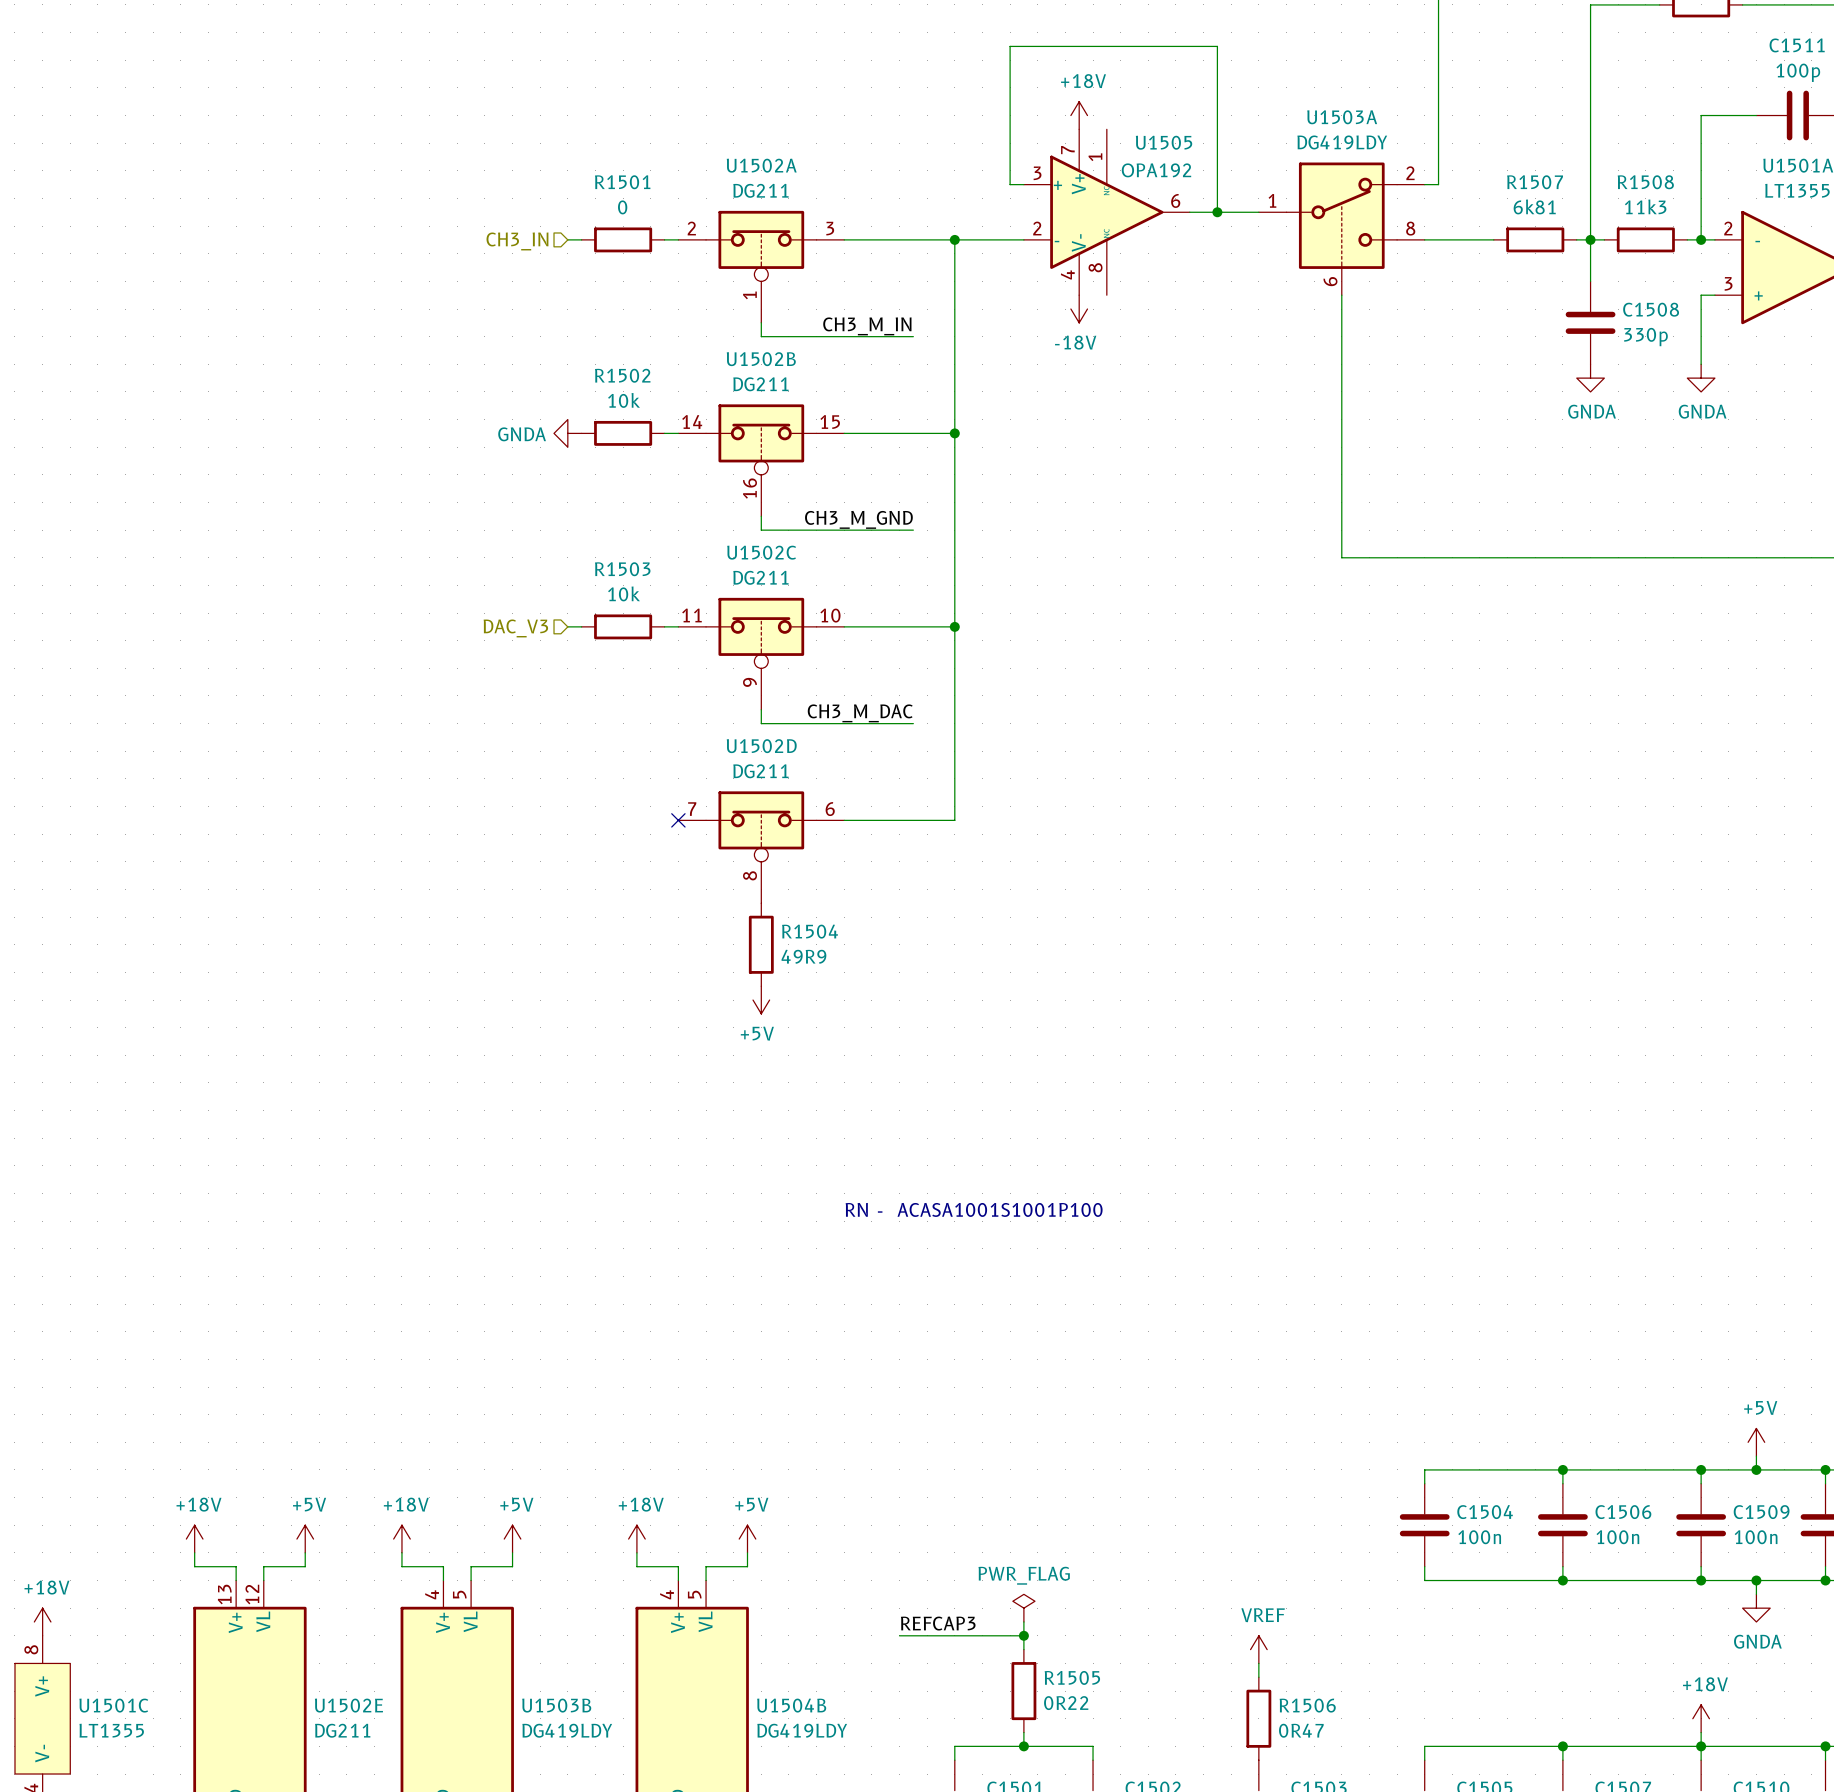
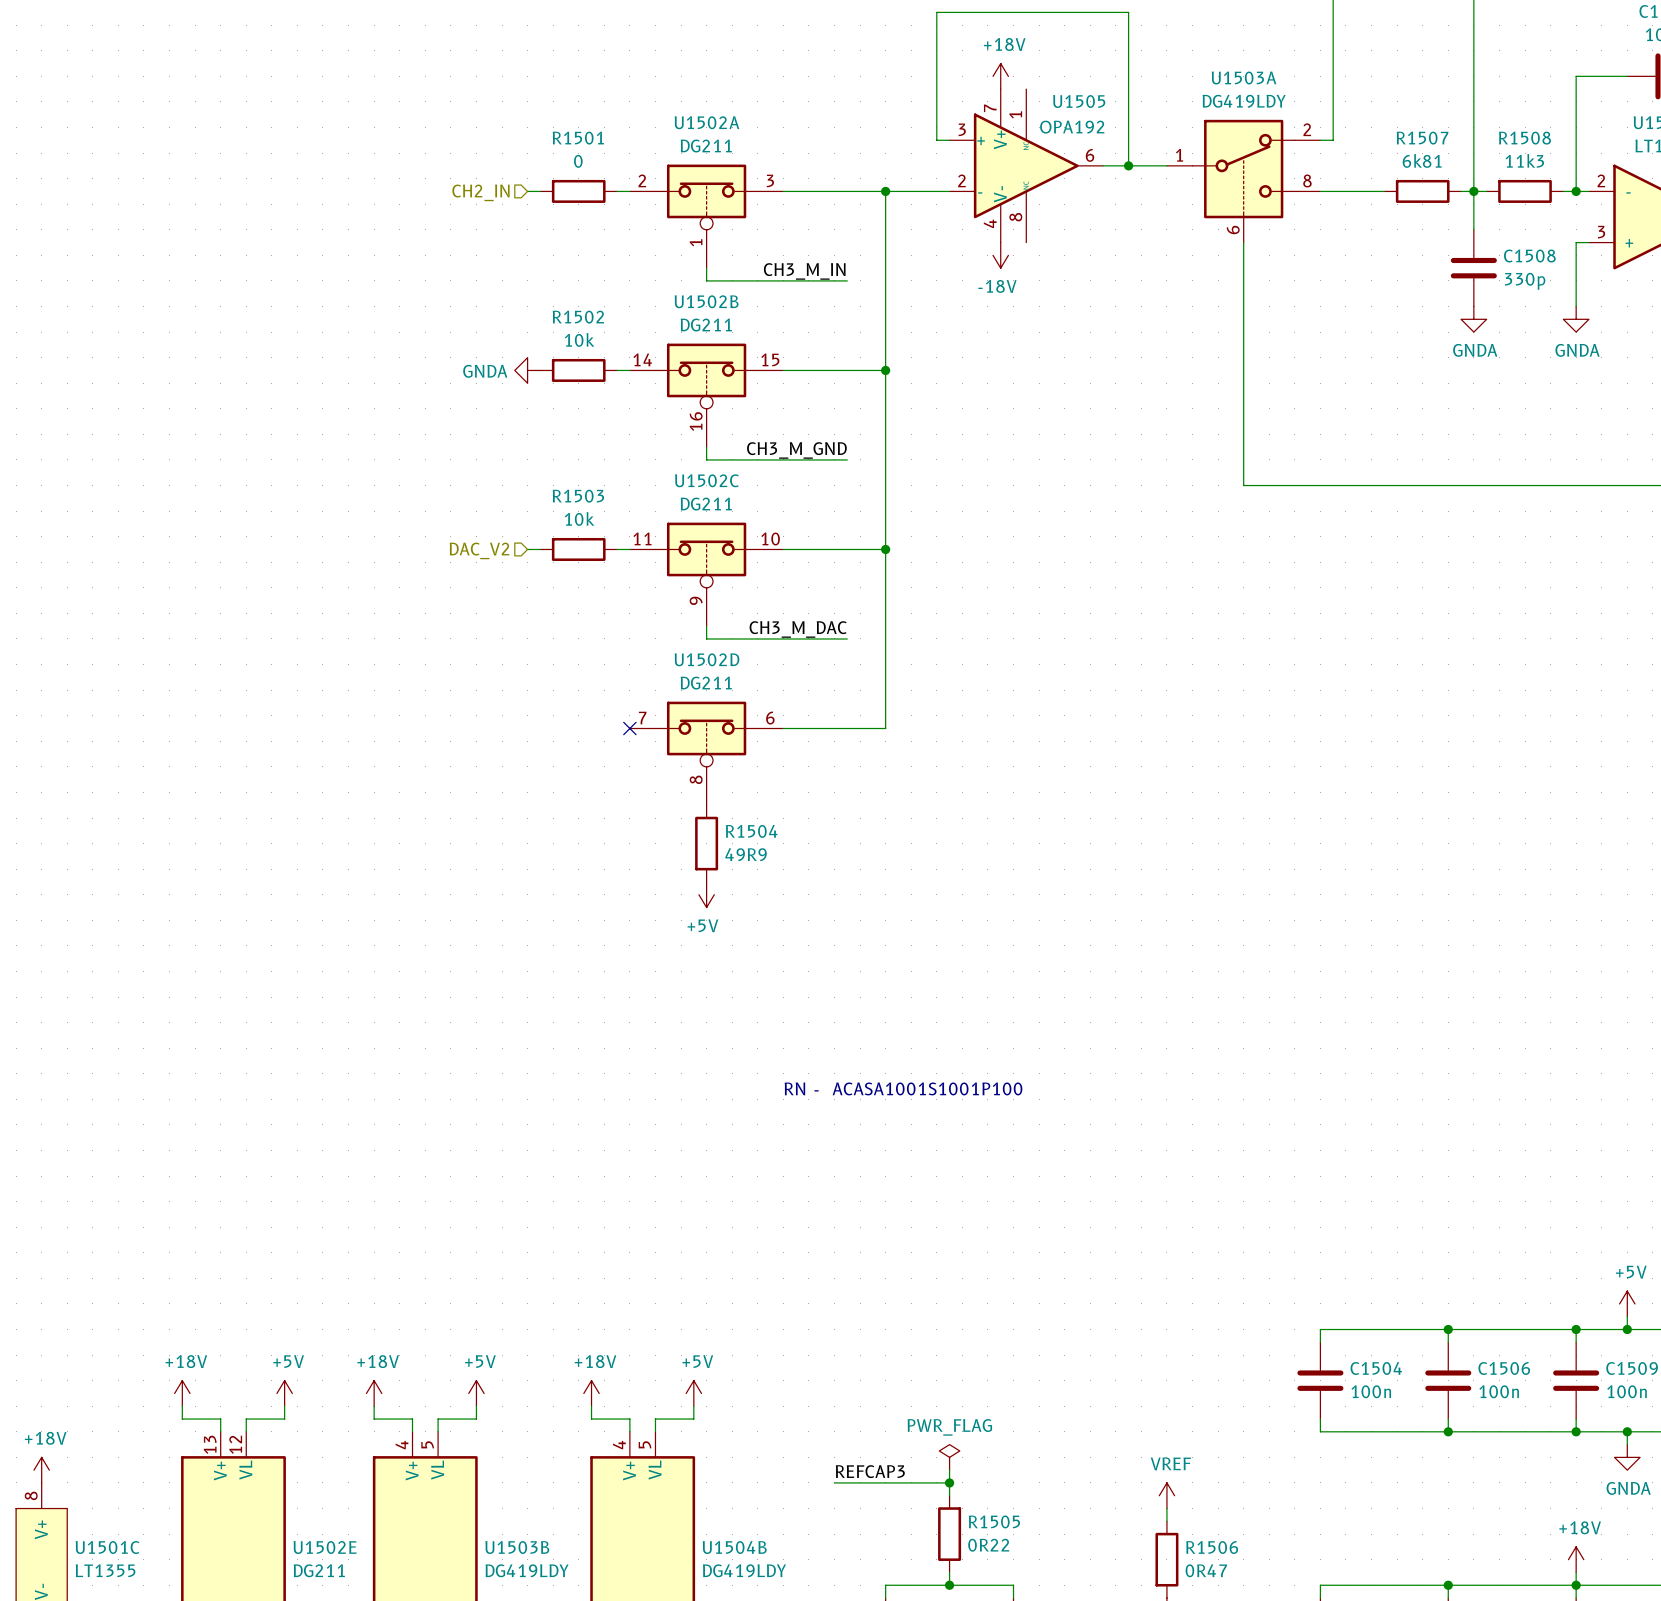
hierarchical label: CH3_IN (517, 241) -> CH2_IN (480, 192)
hierarchical label: DAC_V3 (515, 628) -> DAC_V2 (479, 550)

